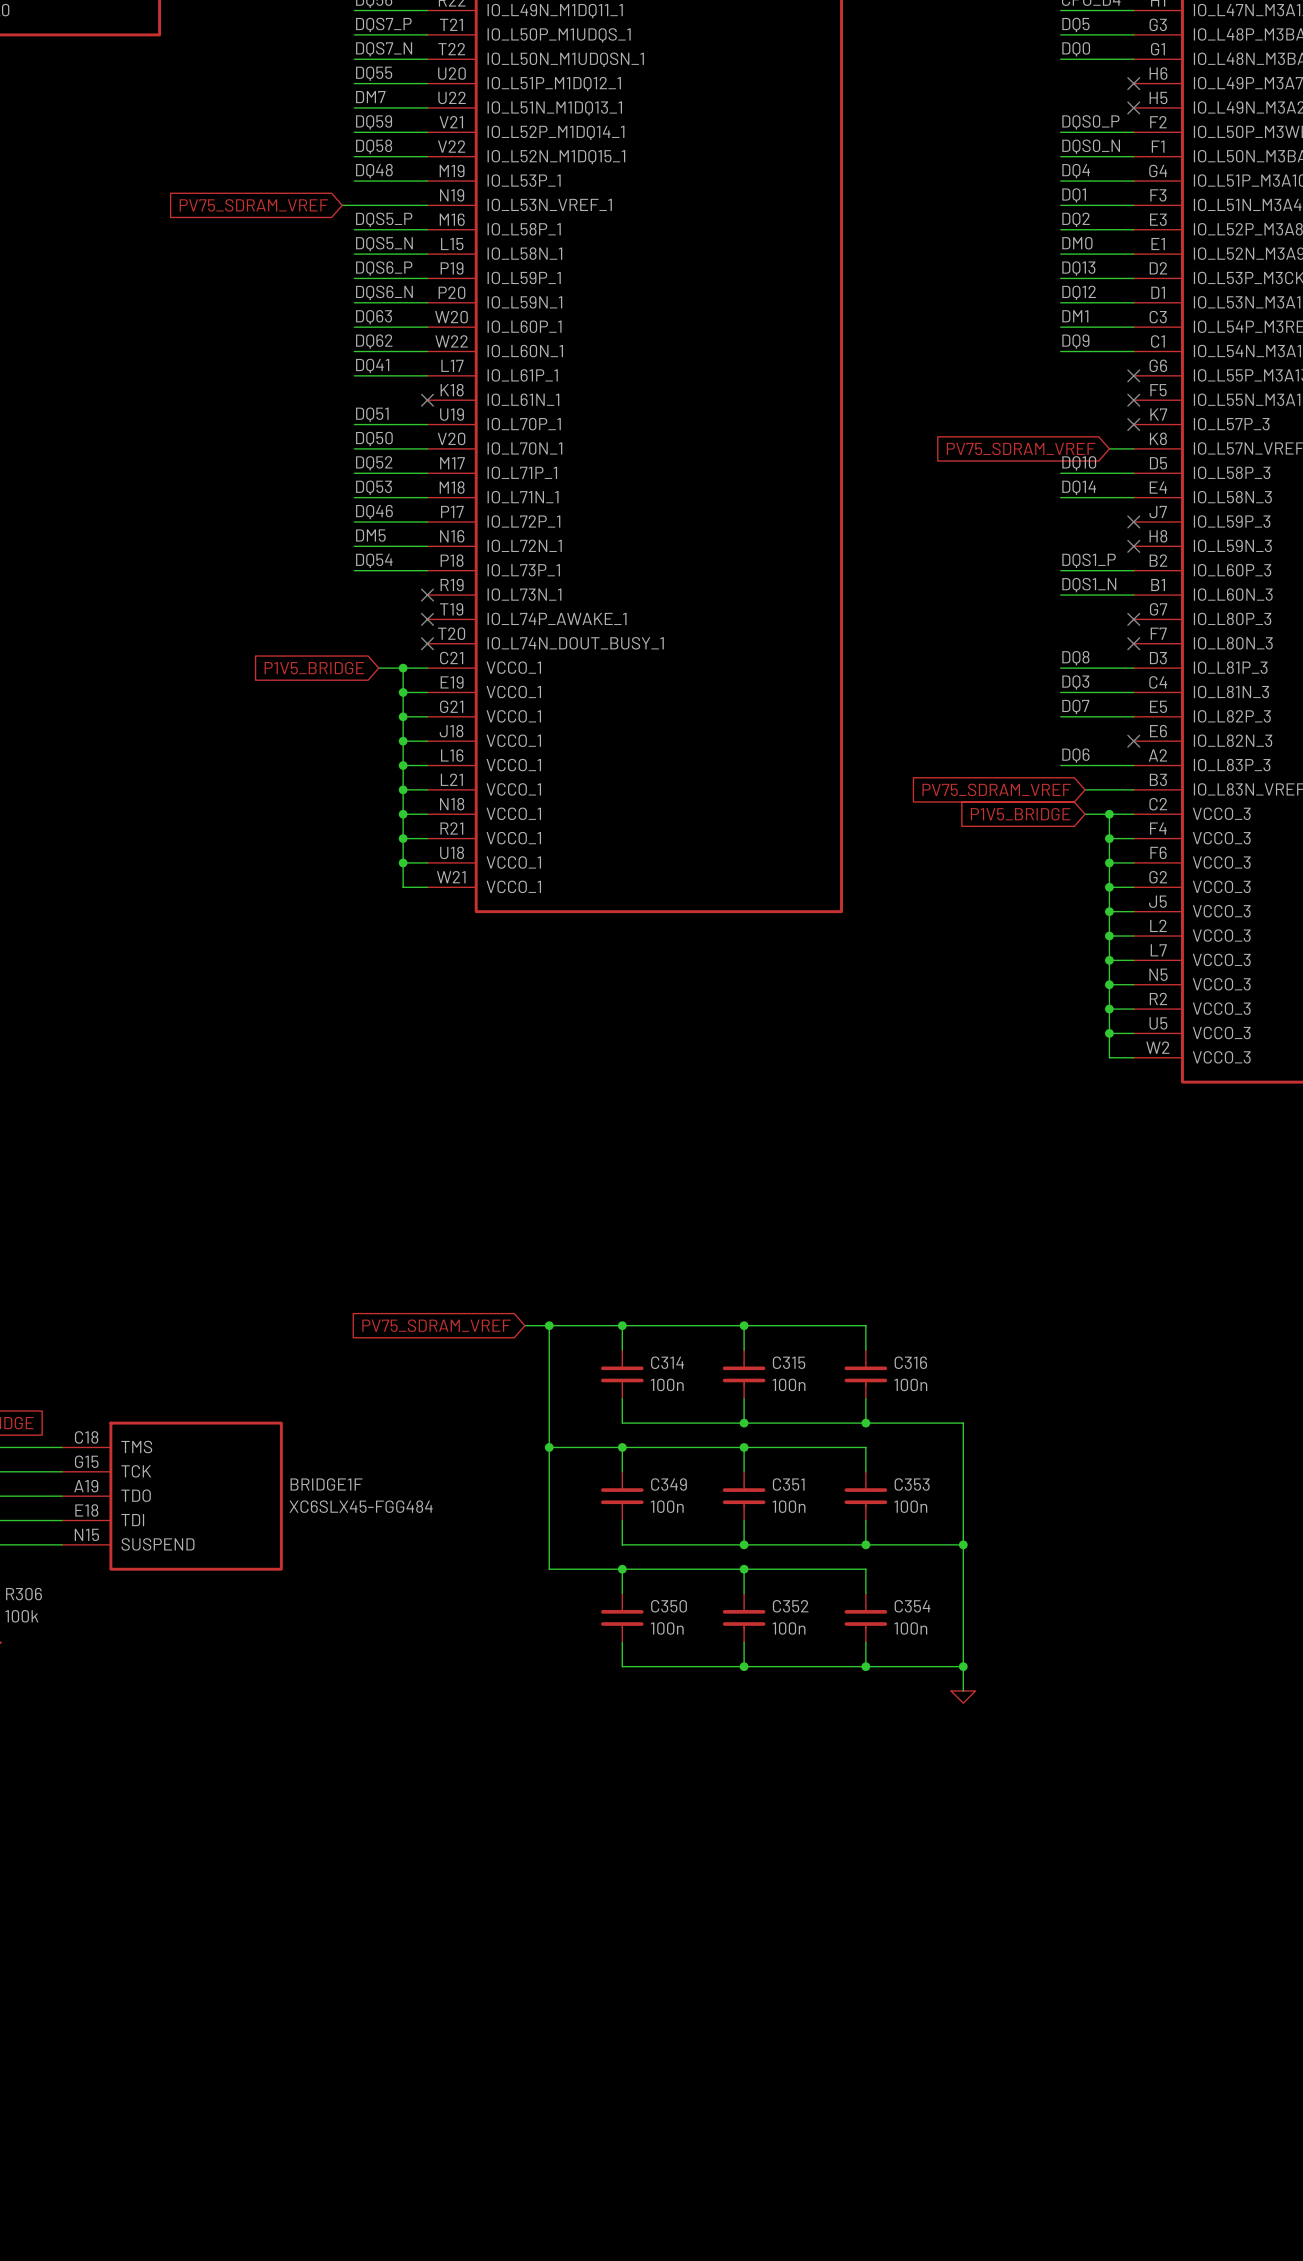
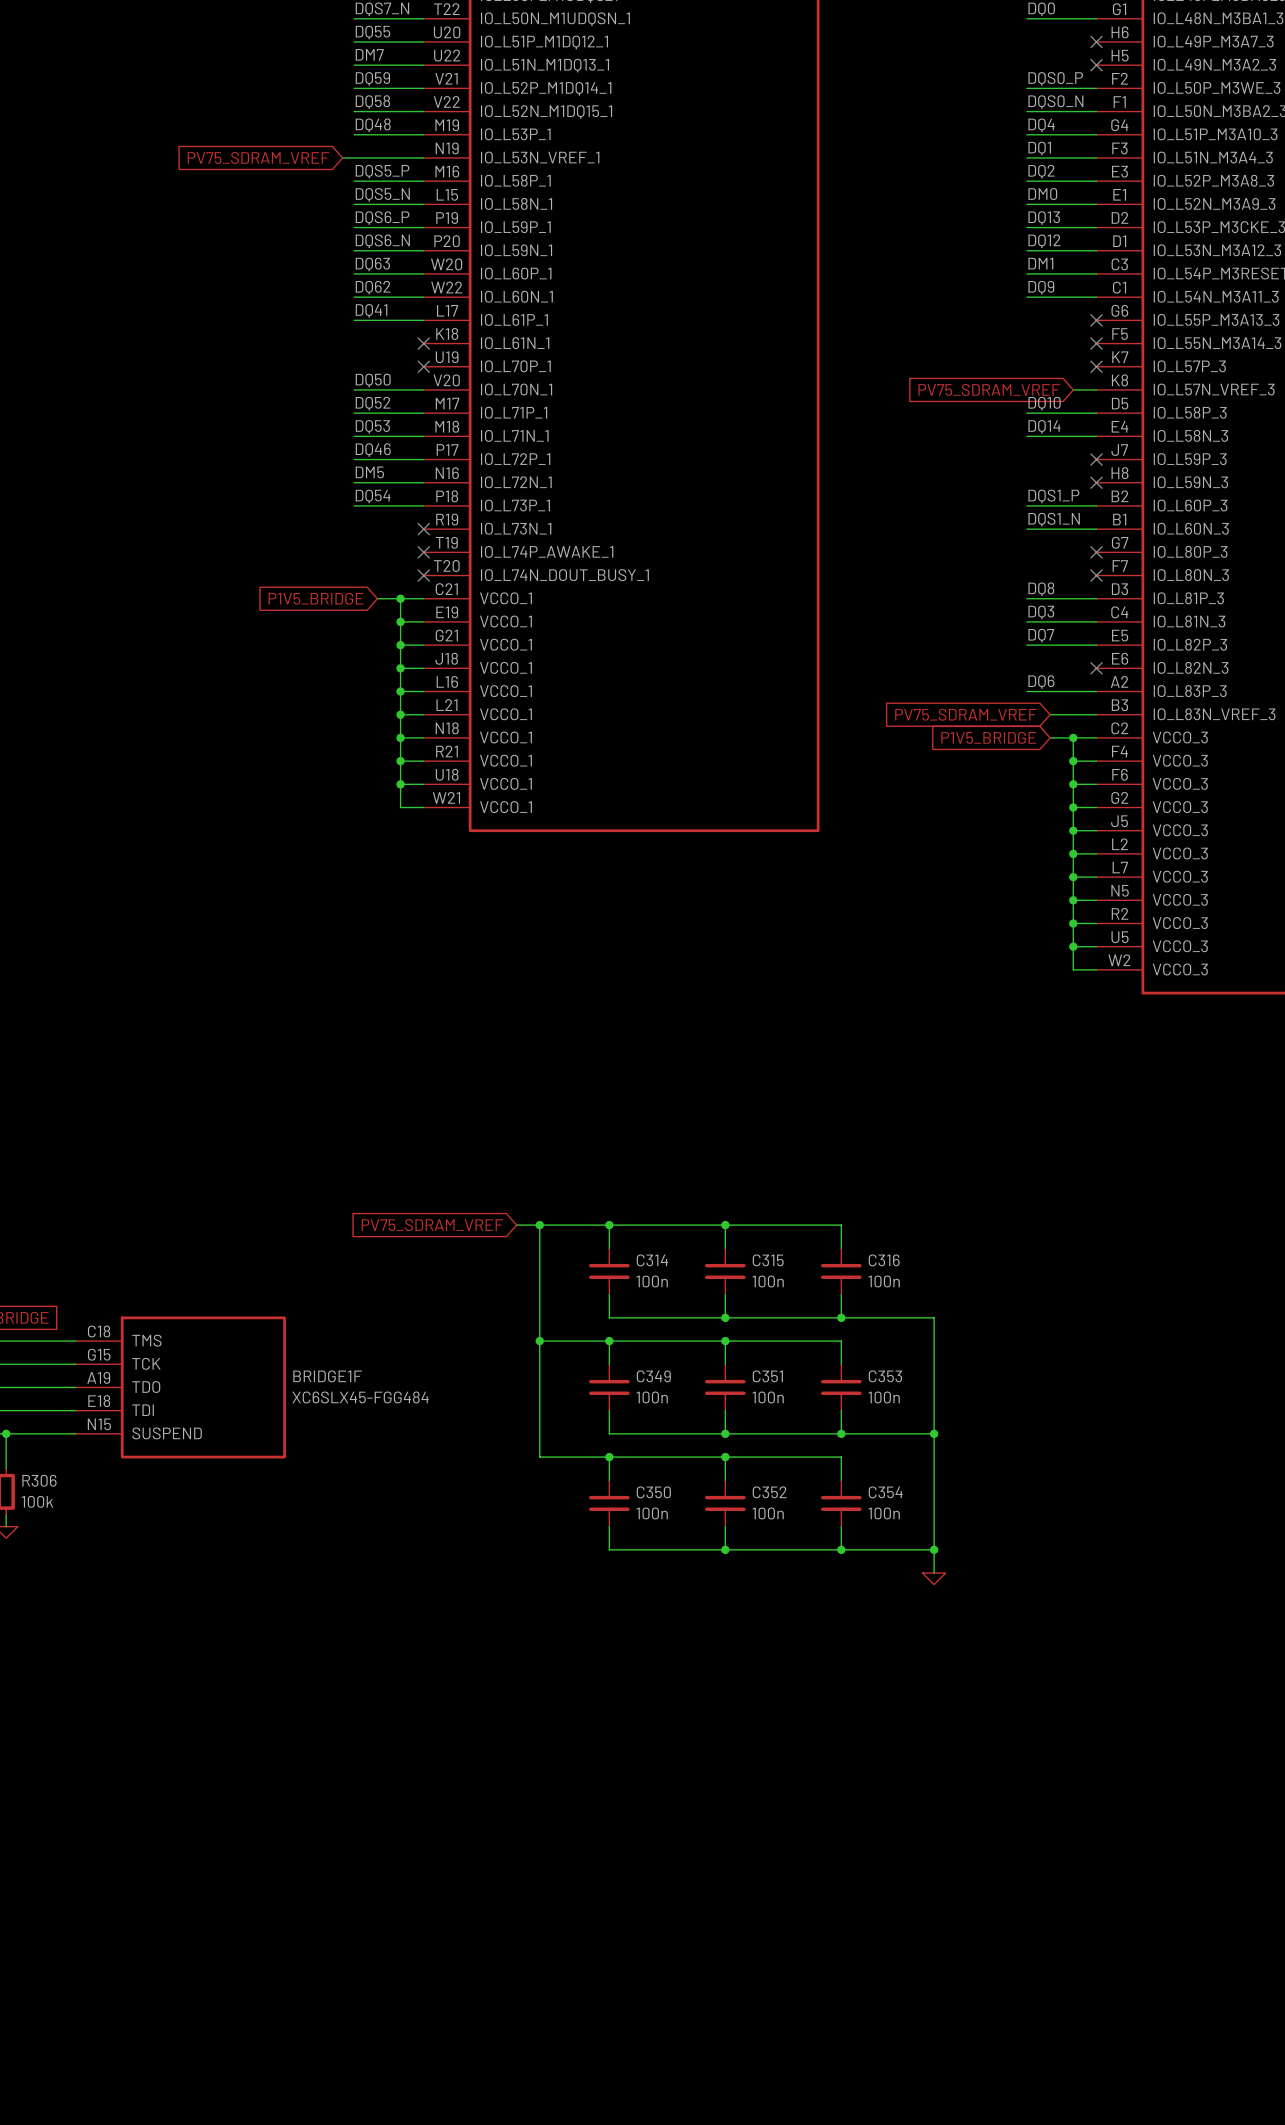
label: DQ51 (372, 414) -> none
wire: (354, 424) (427, 424) -> none
no-connect mark: none -> (423, 366)

